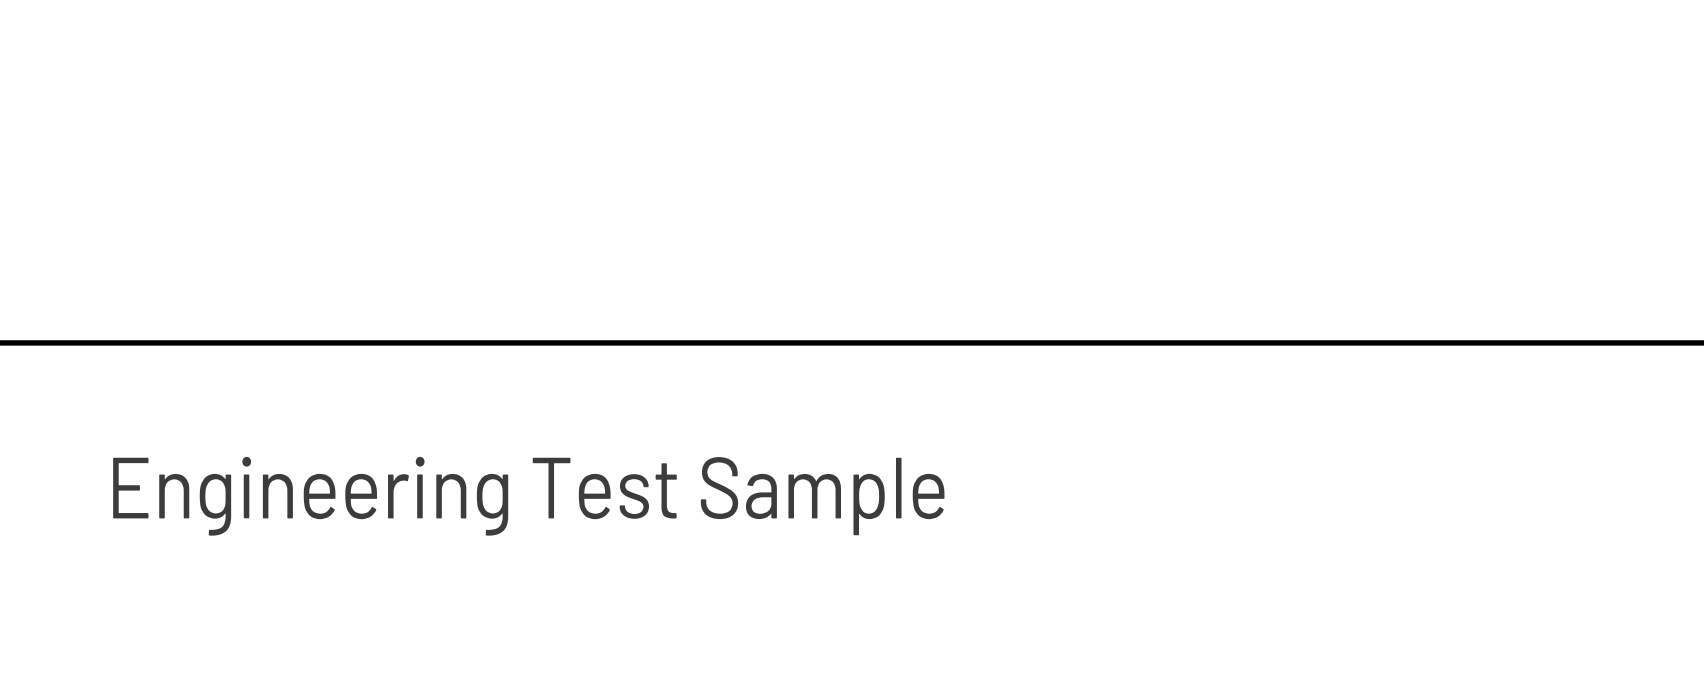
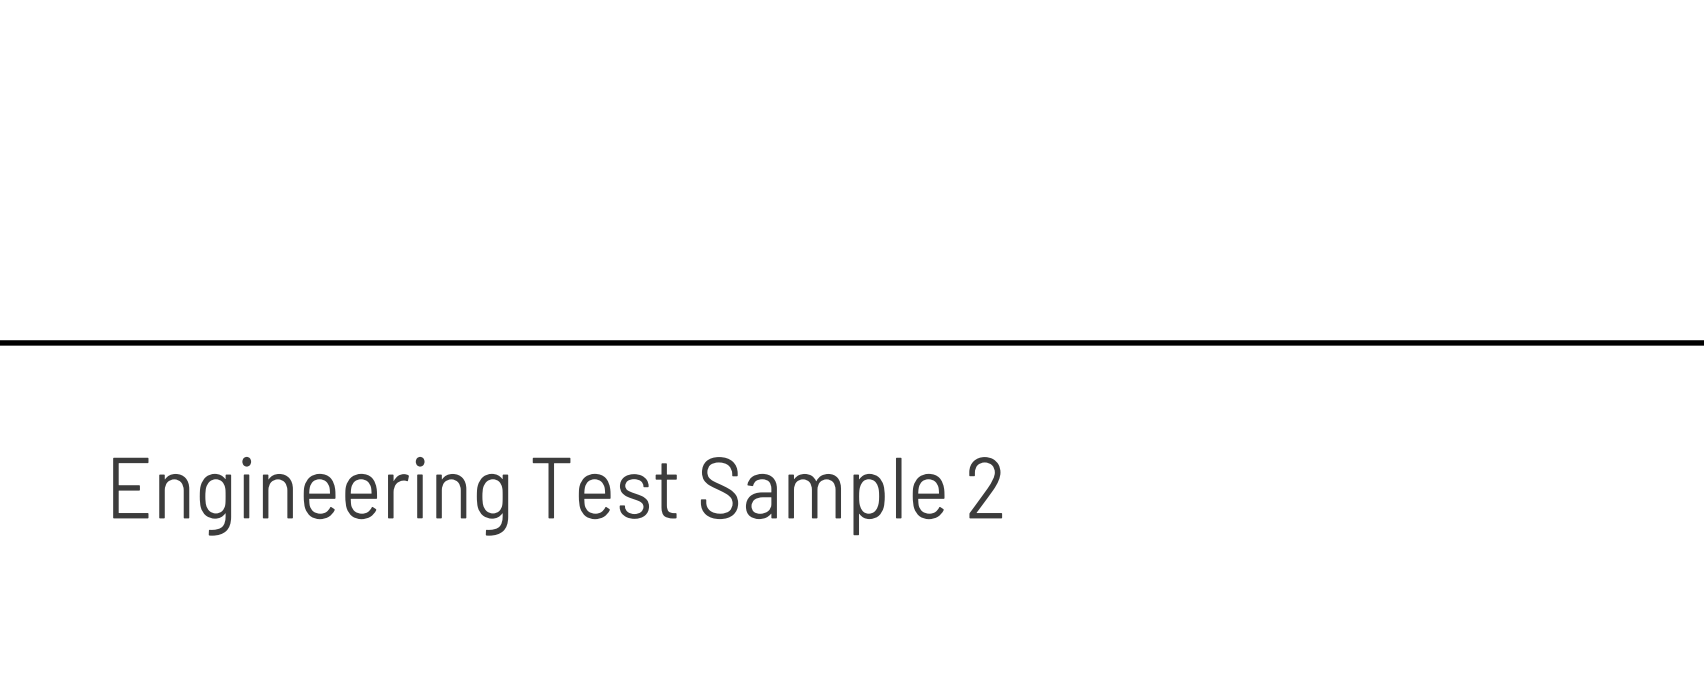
text: Engineering Test Sample (528, 496) -> Engineering Test Sample 2 (557, 496)

